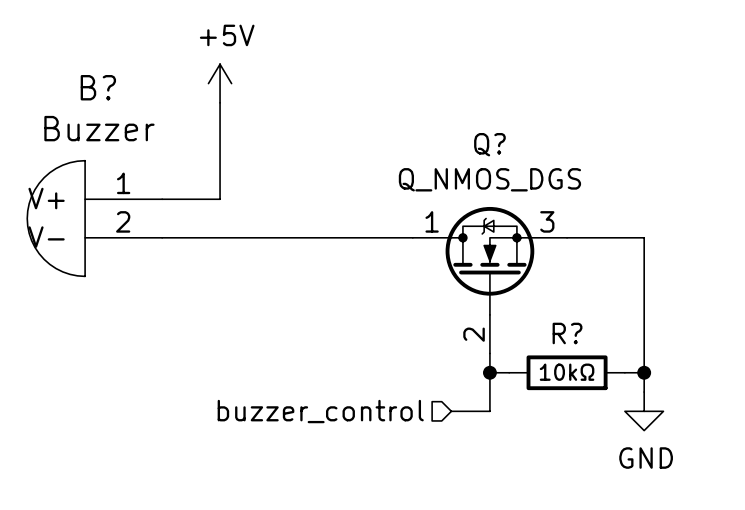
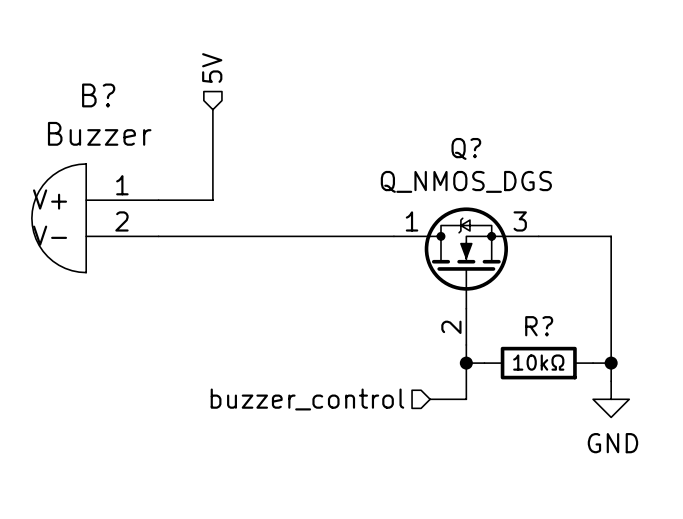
hierarchical label: none -> 5V (212, 68)
power symbol: +5V (220, 83) -> none

